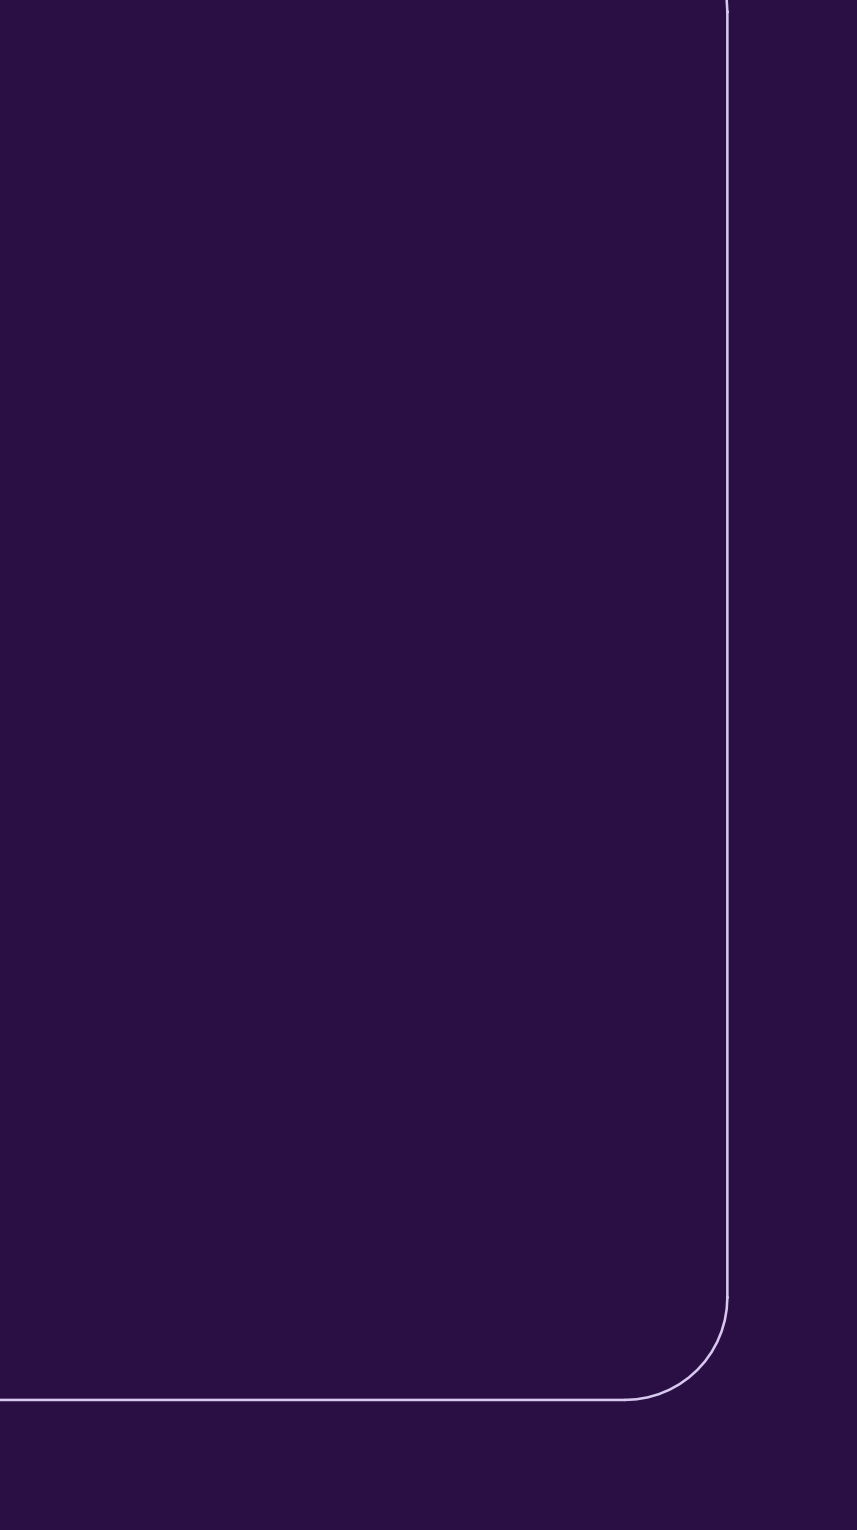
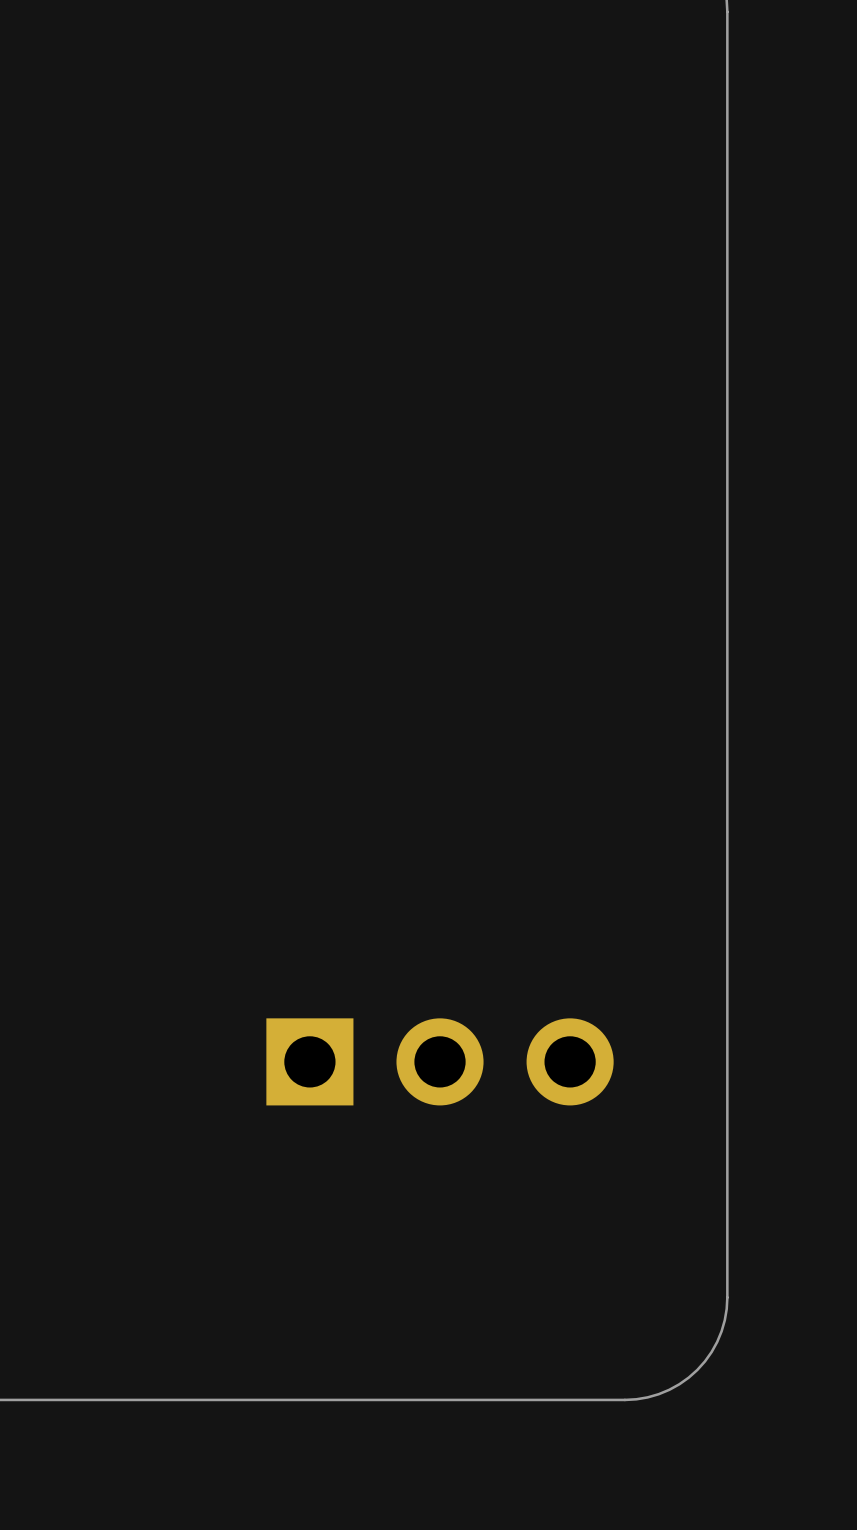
part: none -> (440, 1061)

